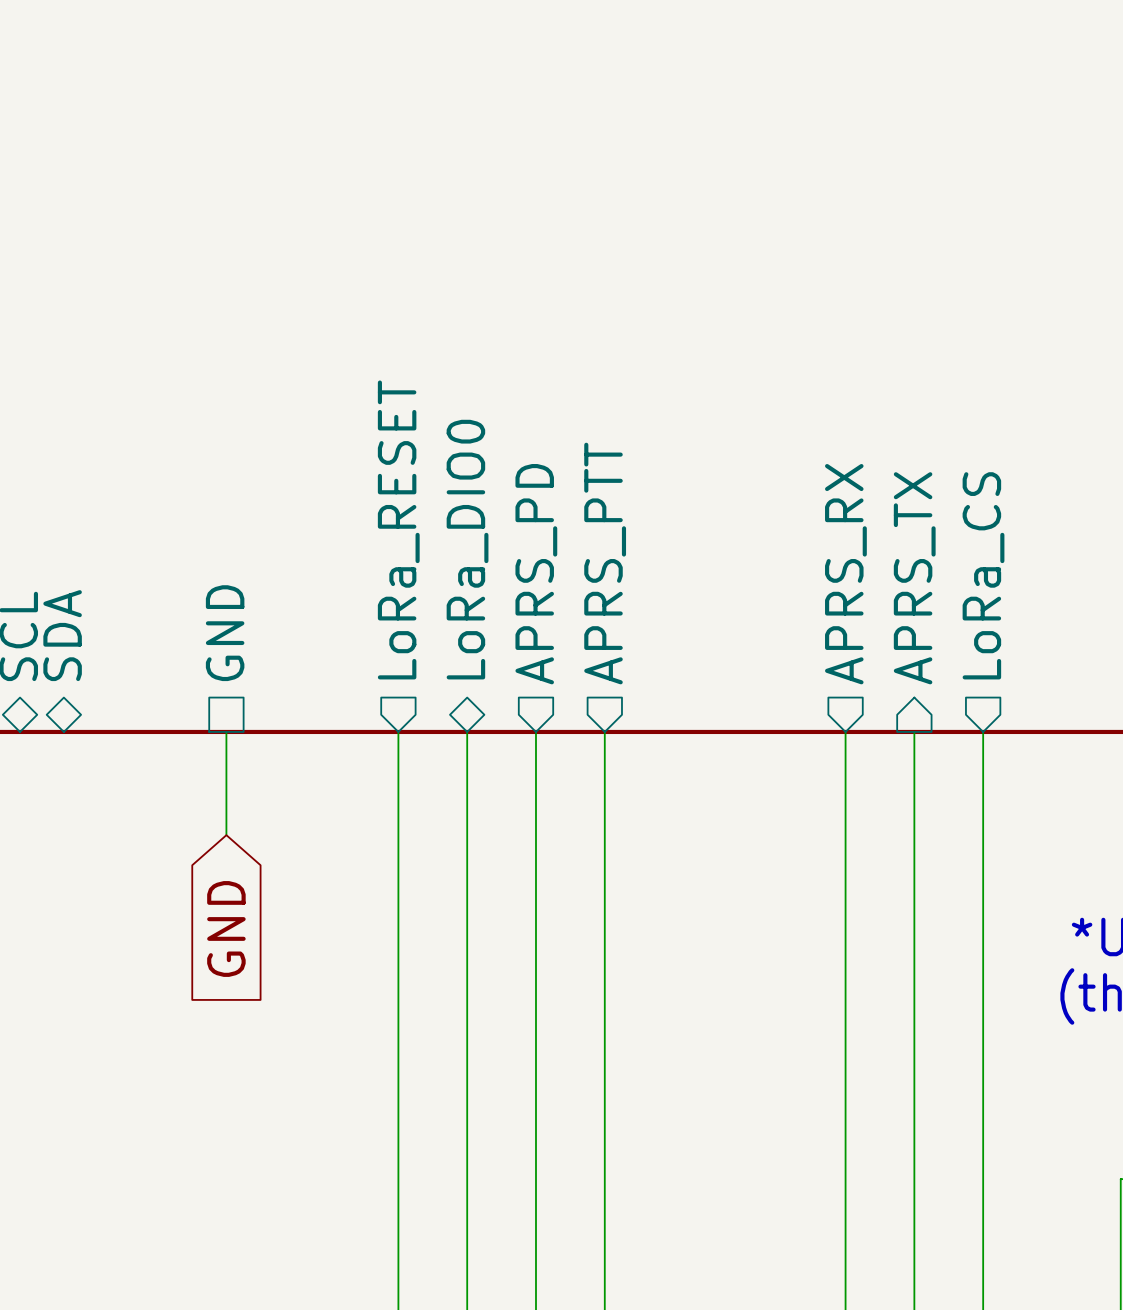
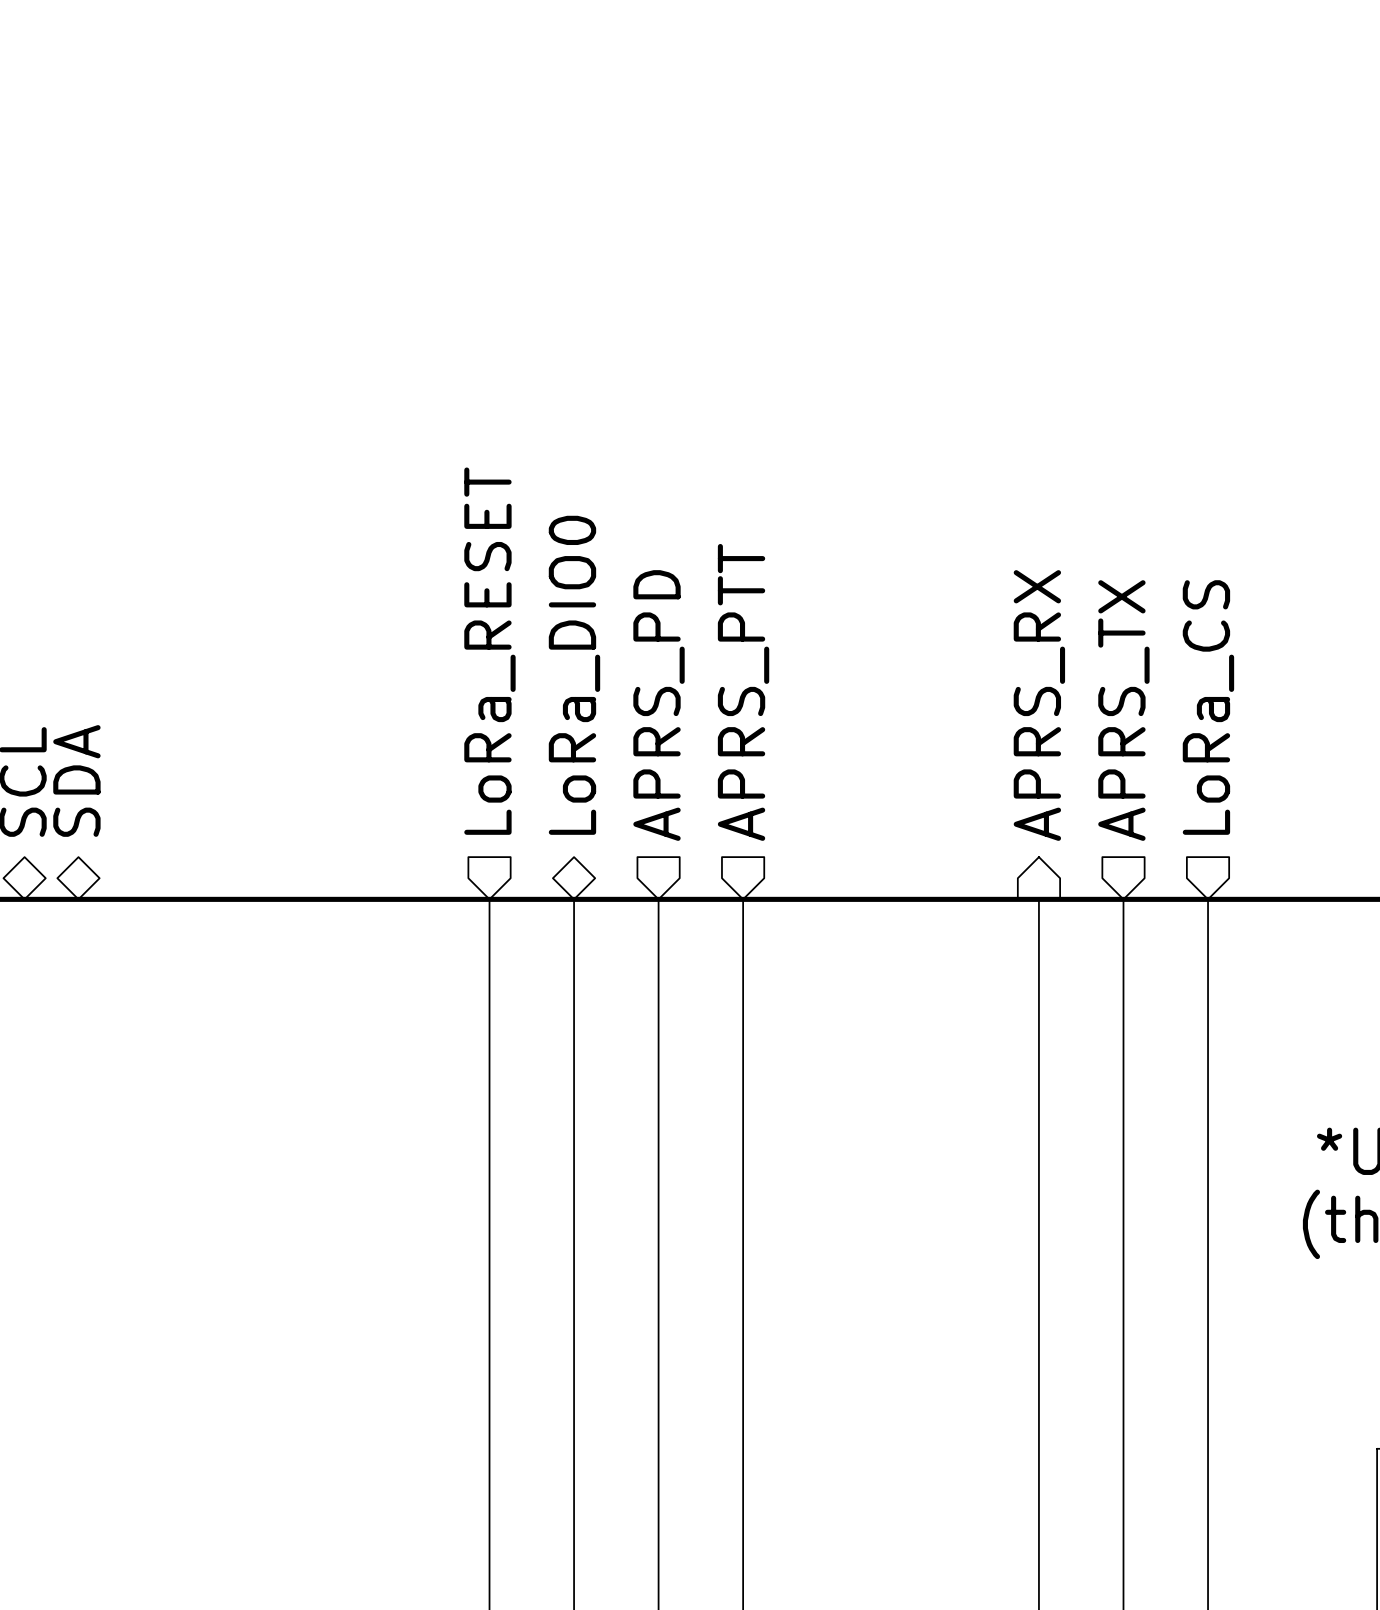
sheet pin shape: output (845, 574) -> input (1039, 705)
sheet pin shape: input (914, 578) -> output (1123, 710)
sheet pin: GND (225, 633) -> none
wire: (226, 731) (226, 835) -> none
global label: GND (226, 928) -> none

